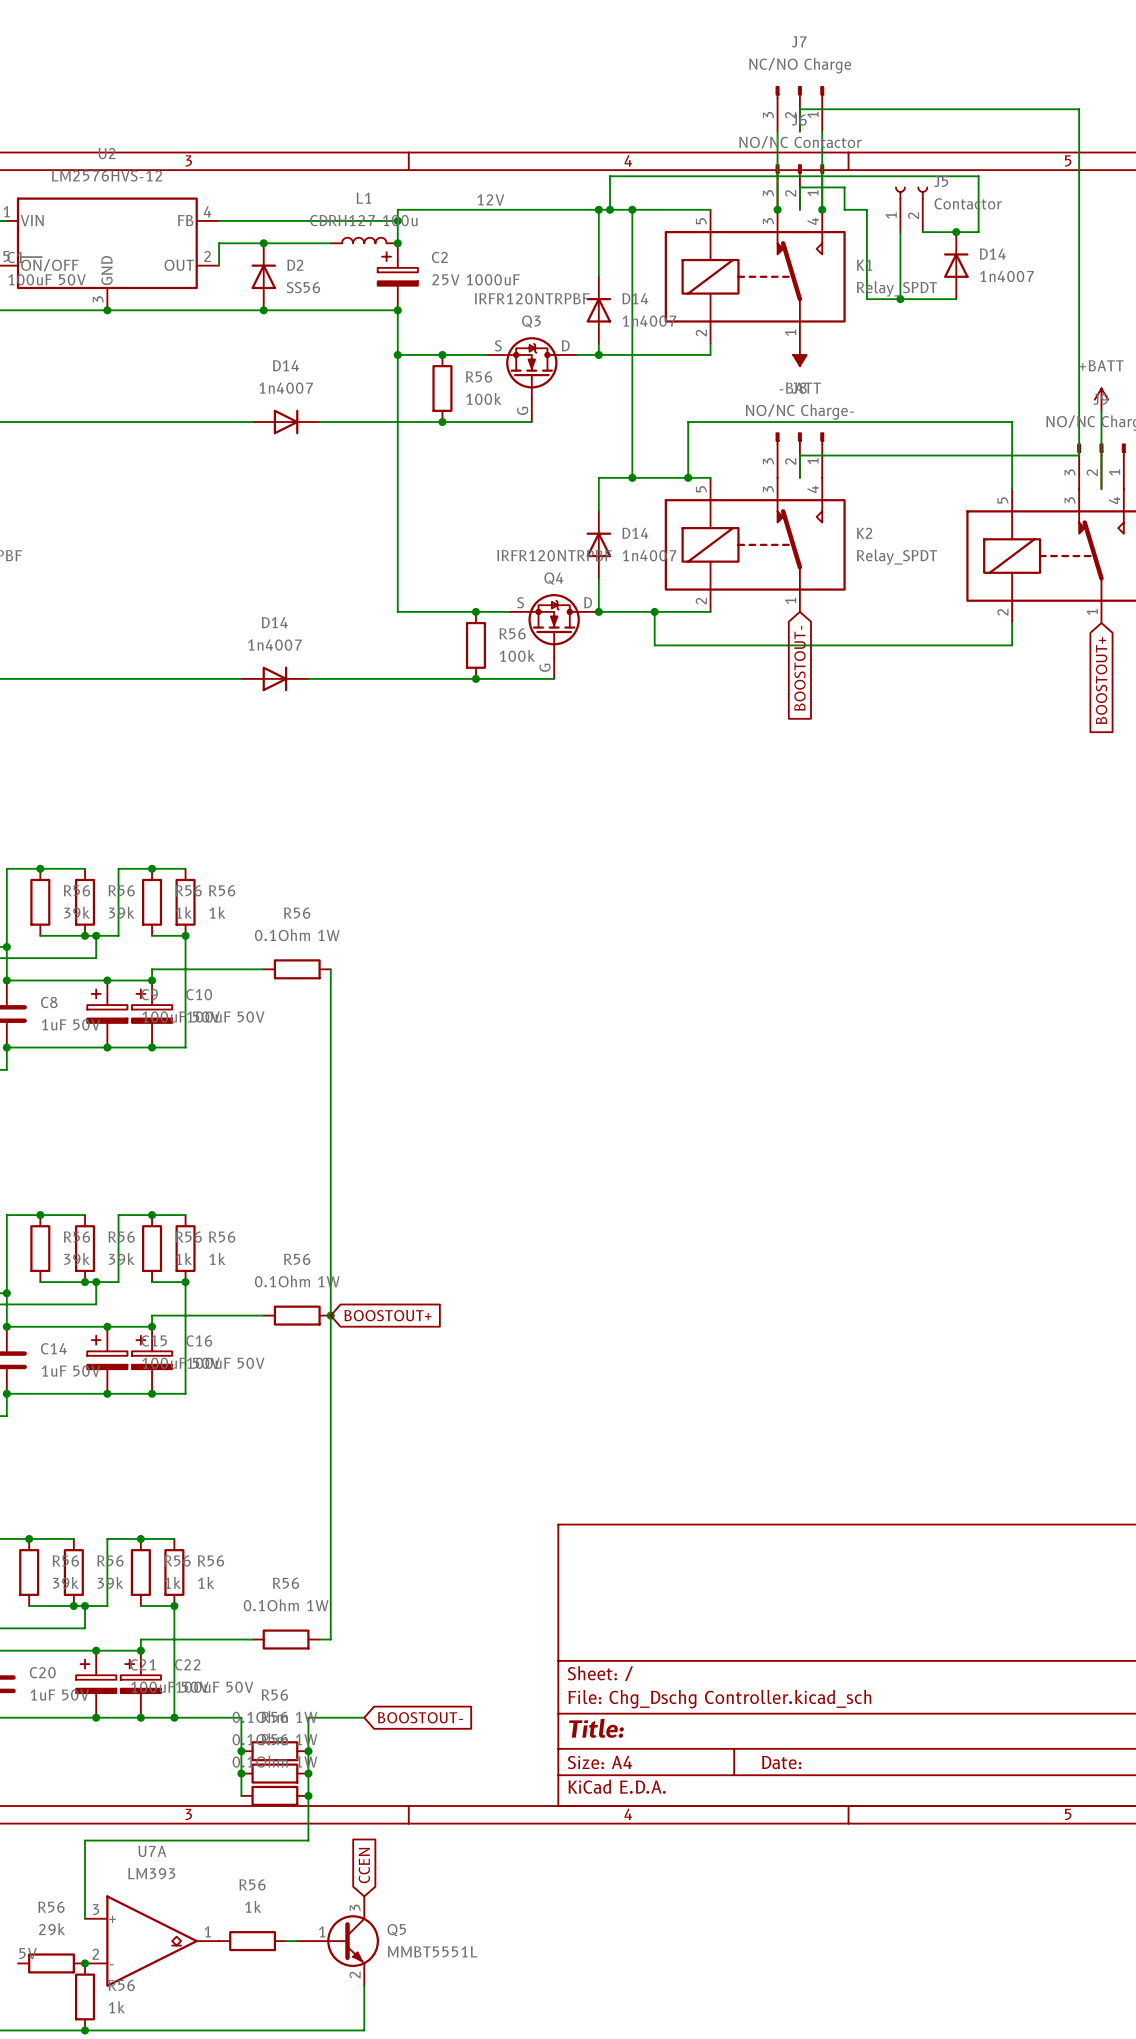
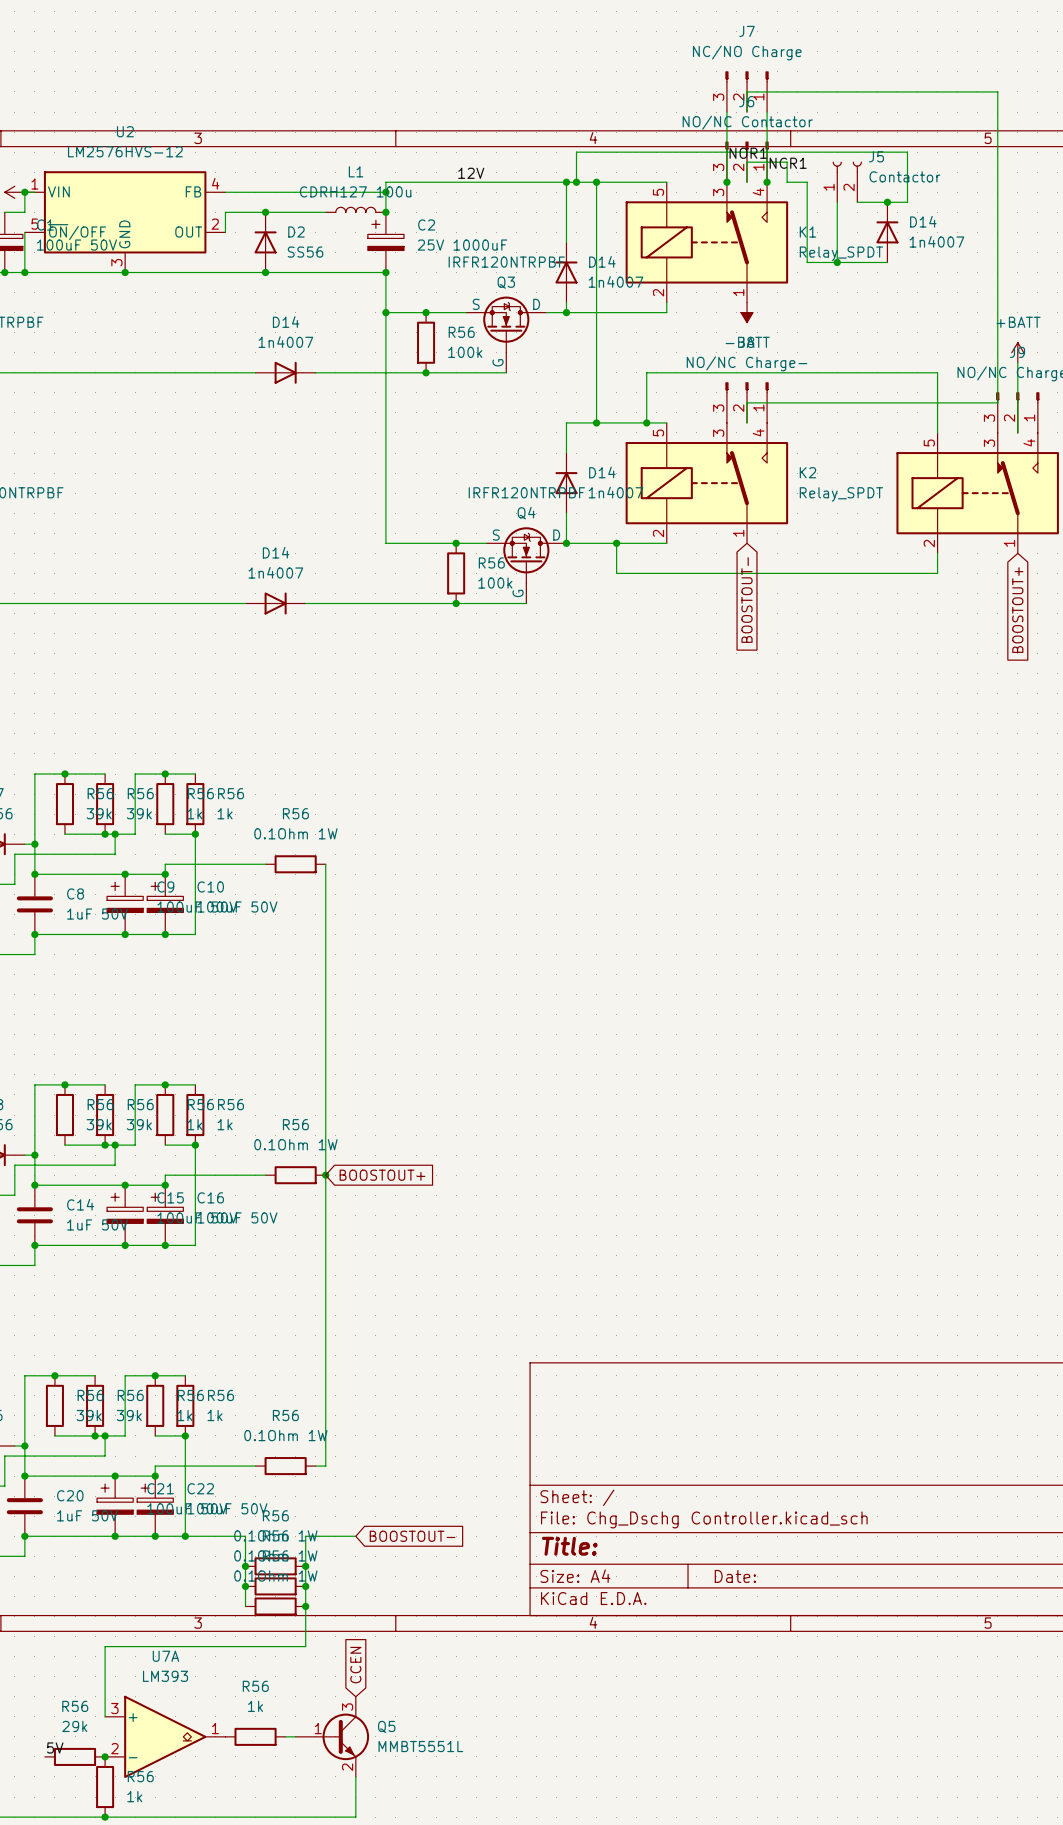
label: none -> NOR1 (748, 153)
label: none -> NCR1 (788, 163)

